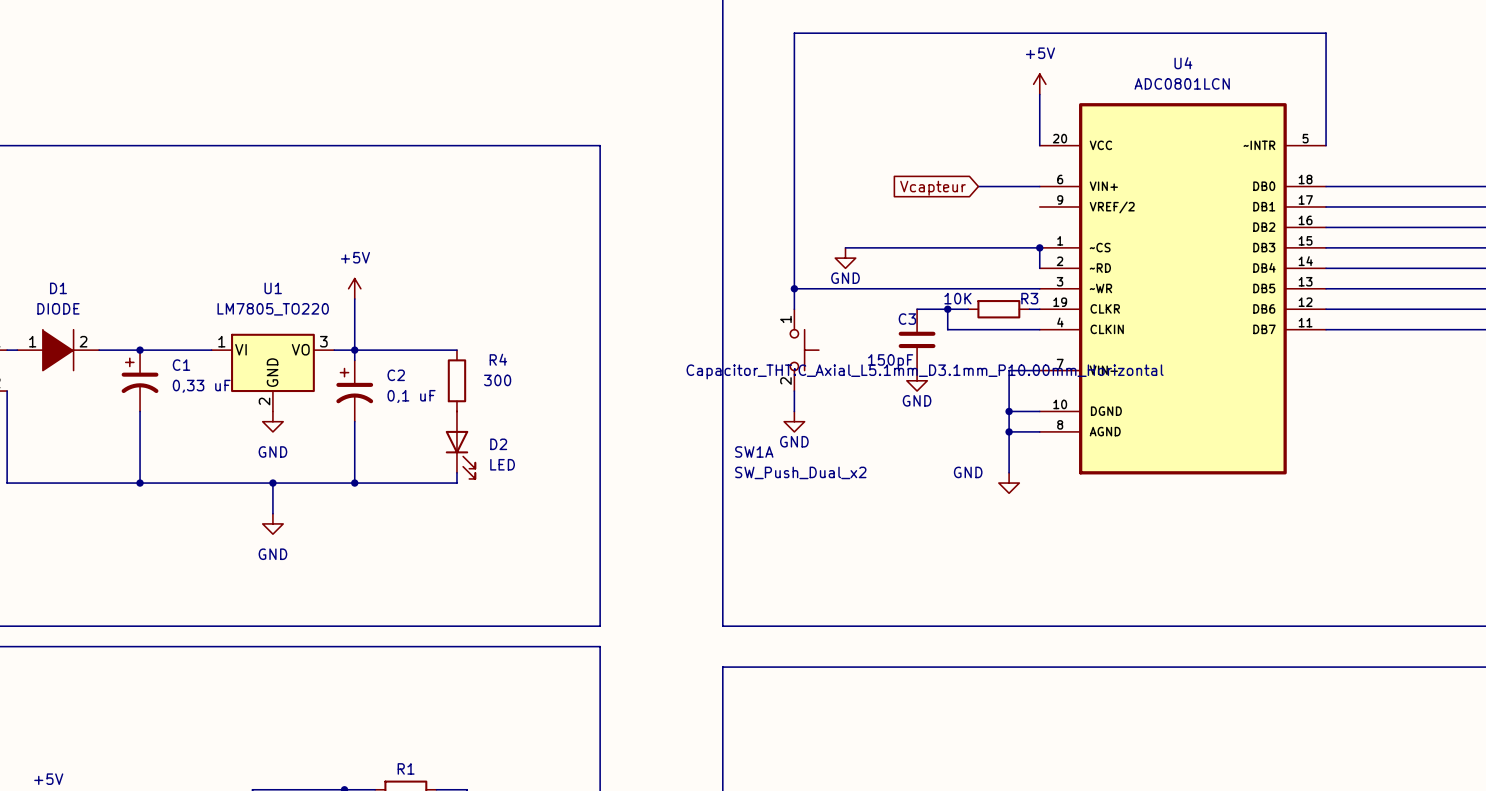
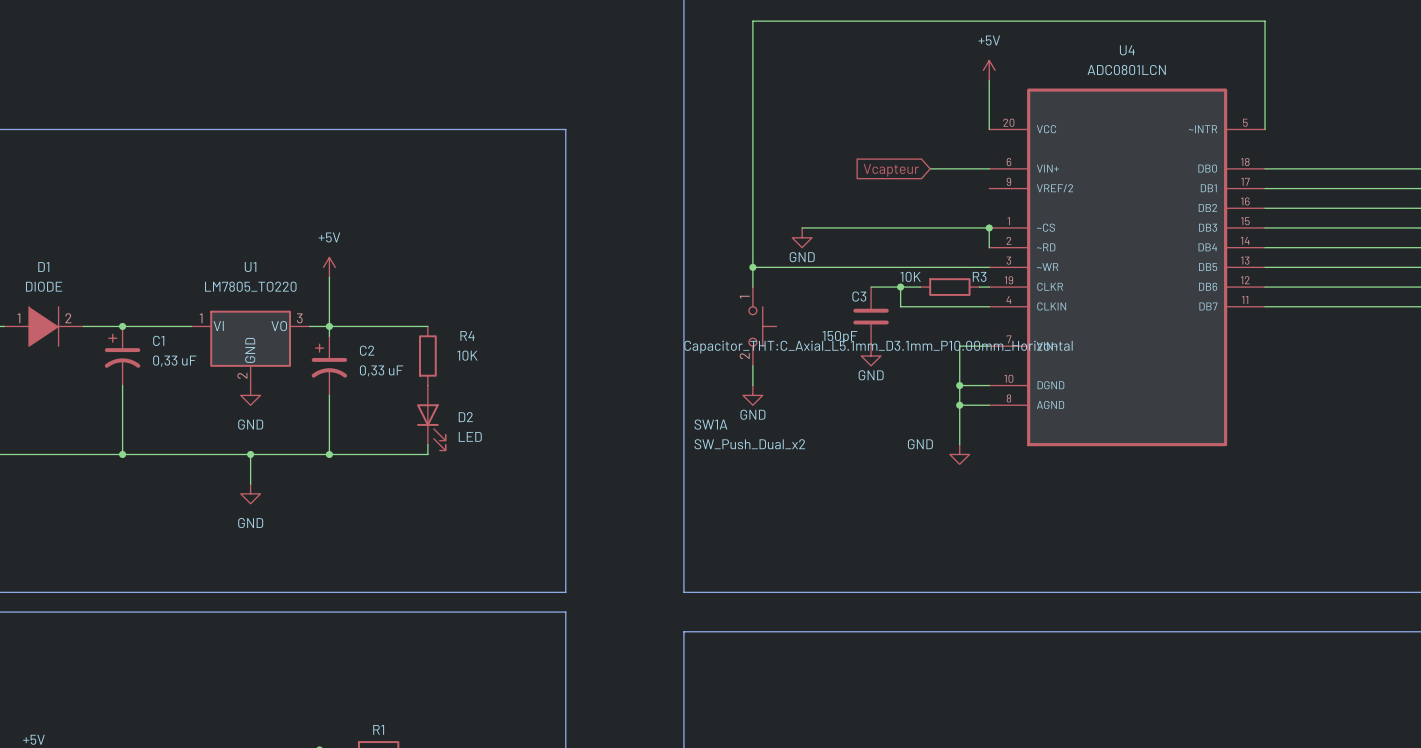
R4 value: 300 (497, 380) -> 10K (467, 355)
C2 value: 0,1 uF (411, 396) -> 0,33 uF (381, 370)

